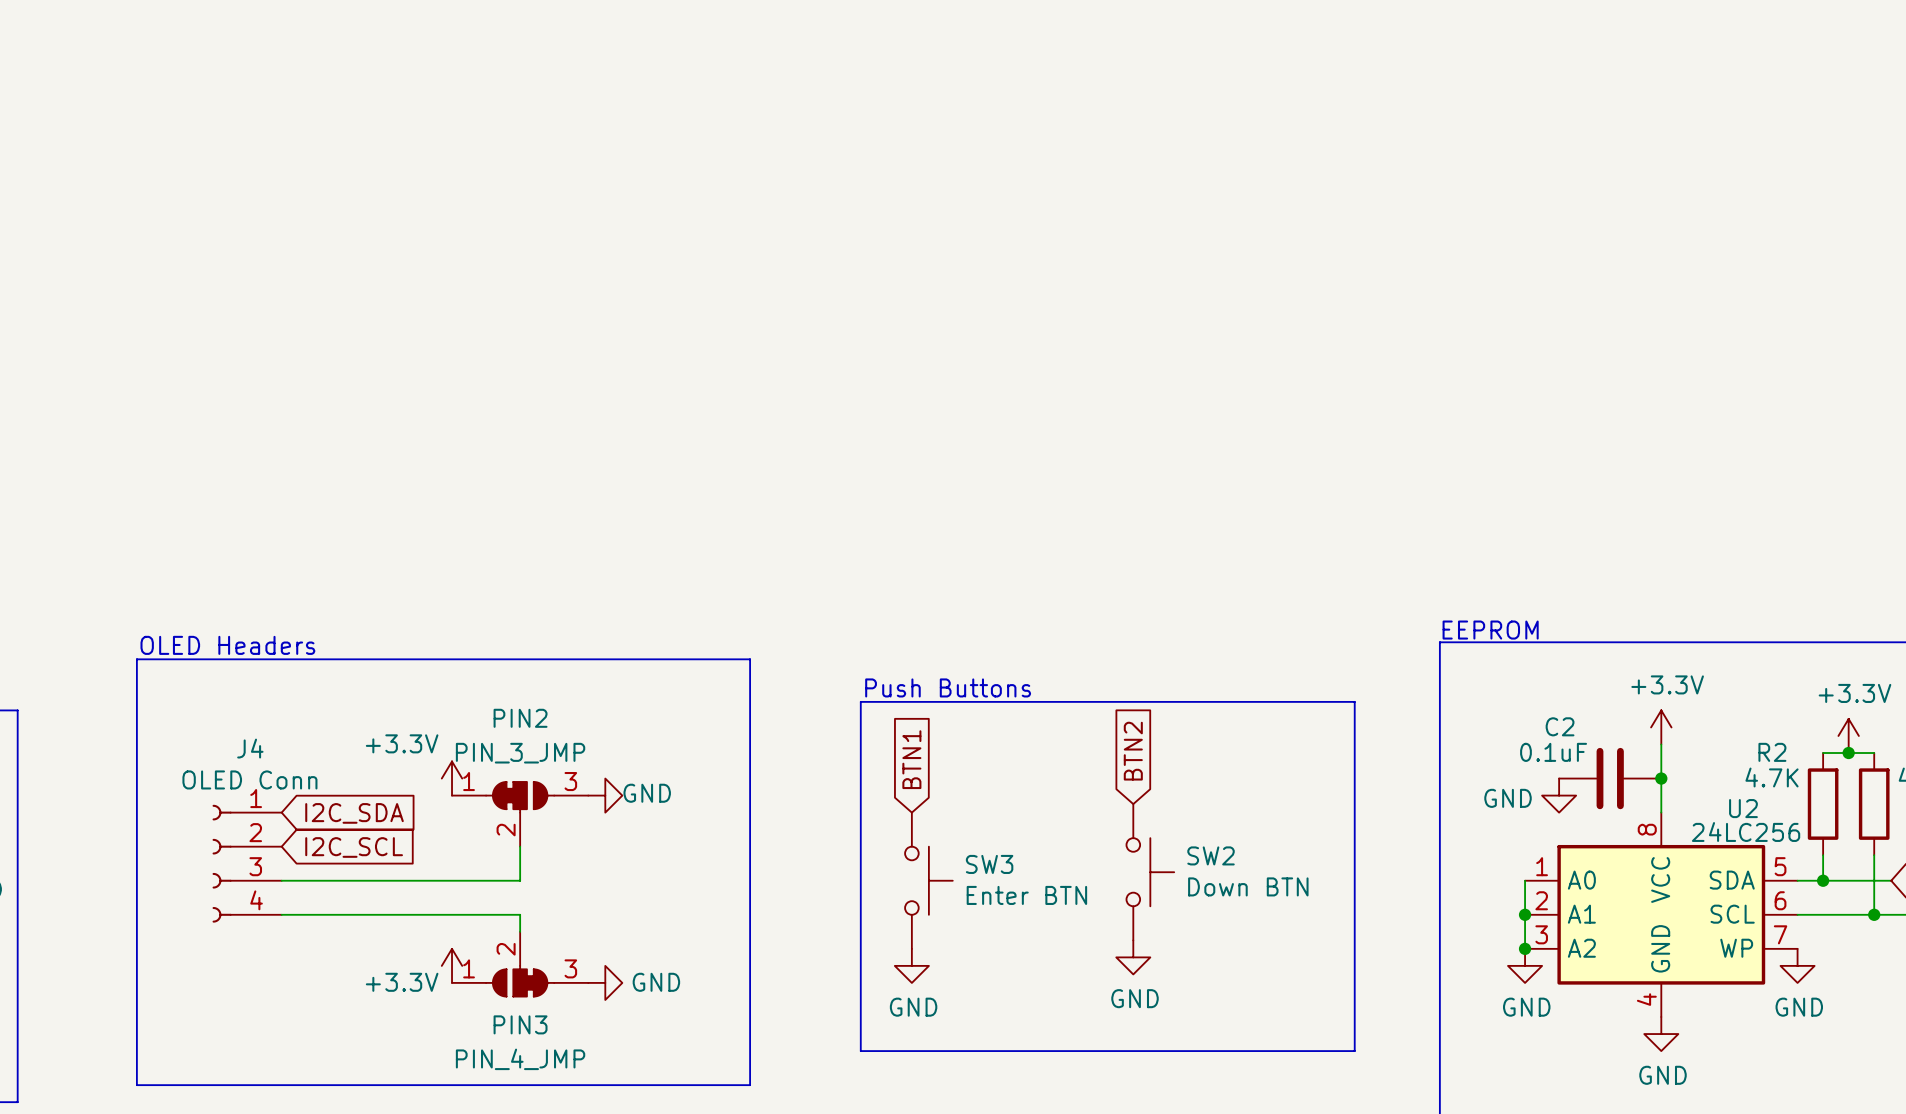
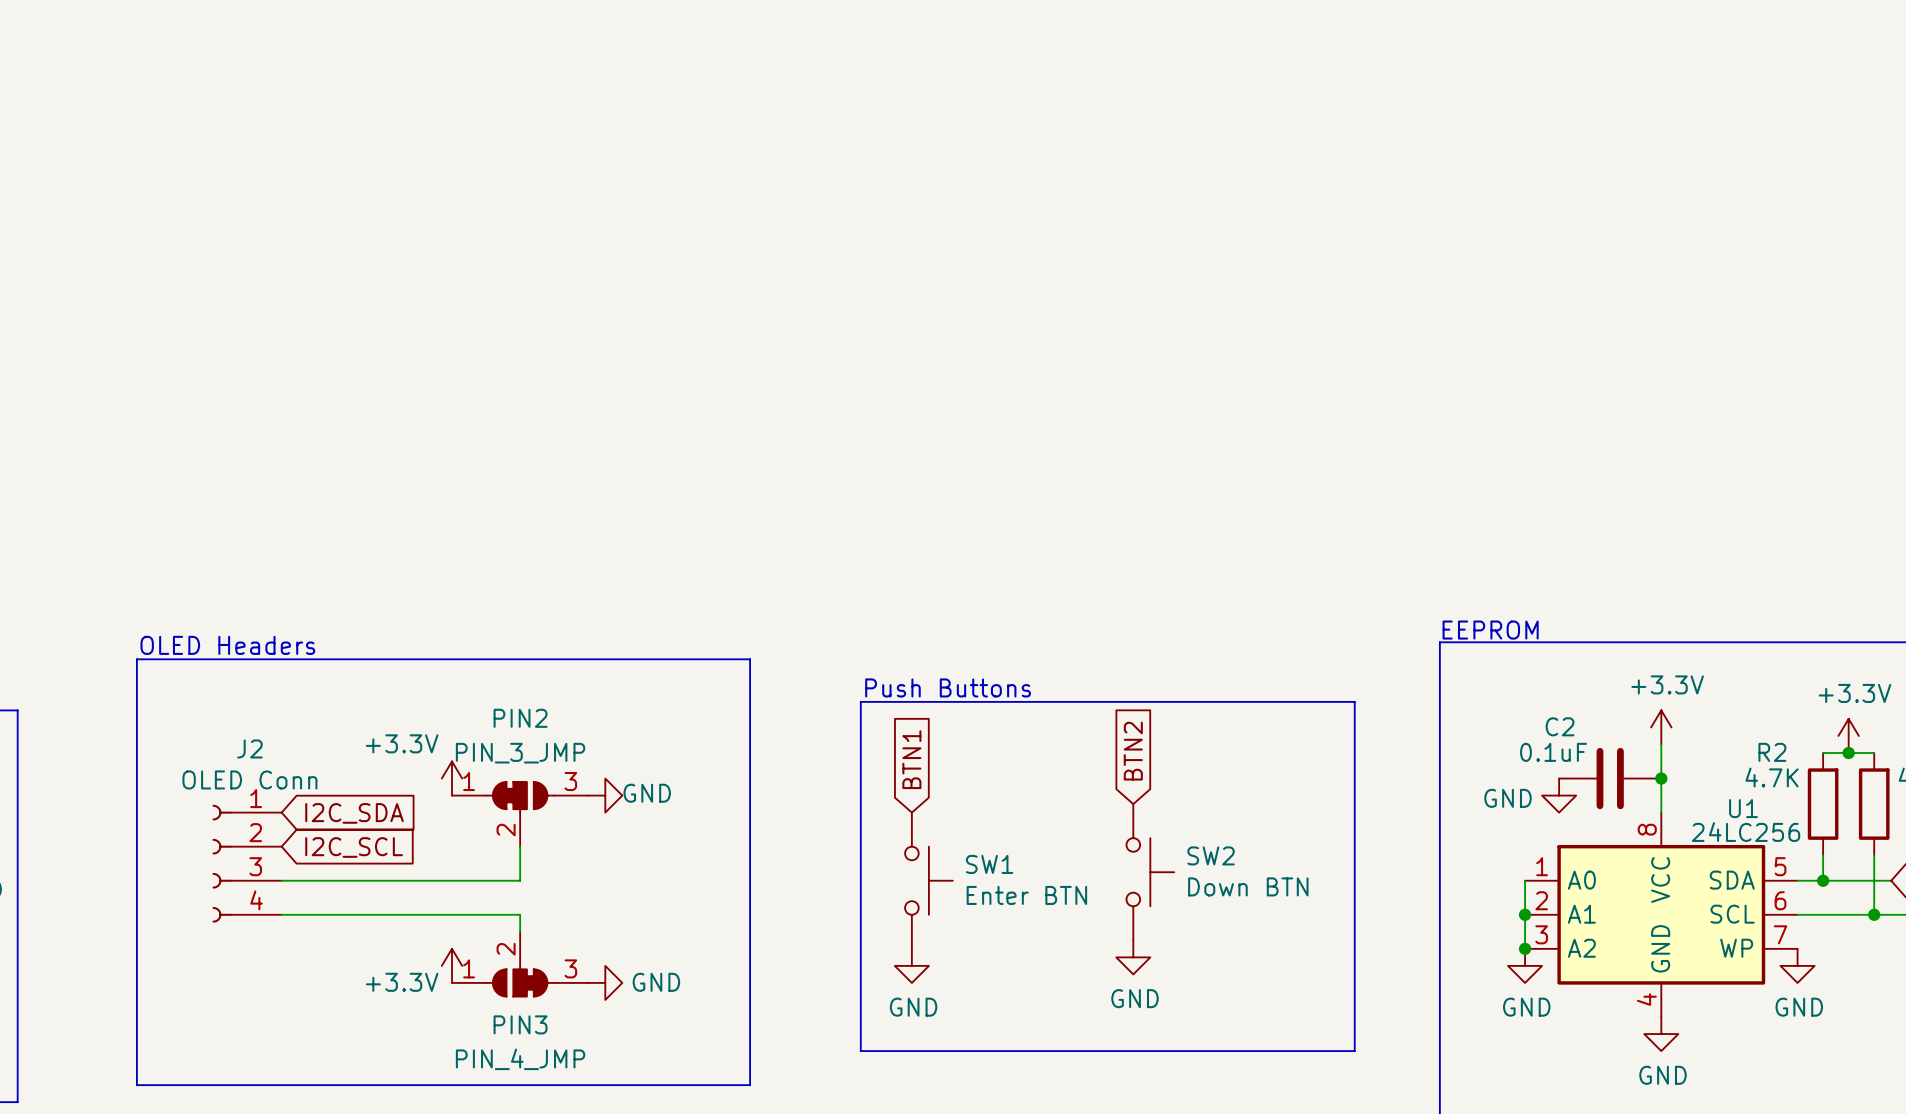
J4 name: J4 (250, 748) -> J2 (249, 748)
U2 name: U2 (1743, 808) -> U1 (1743, 808)
SW3 name: SW3 (989, 864) -> SW1 (989, 864)

